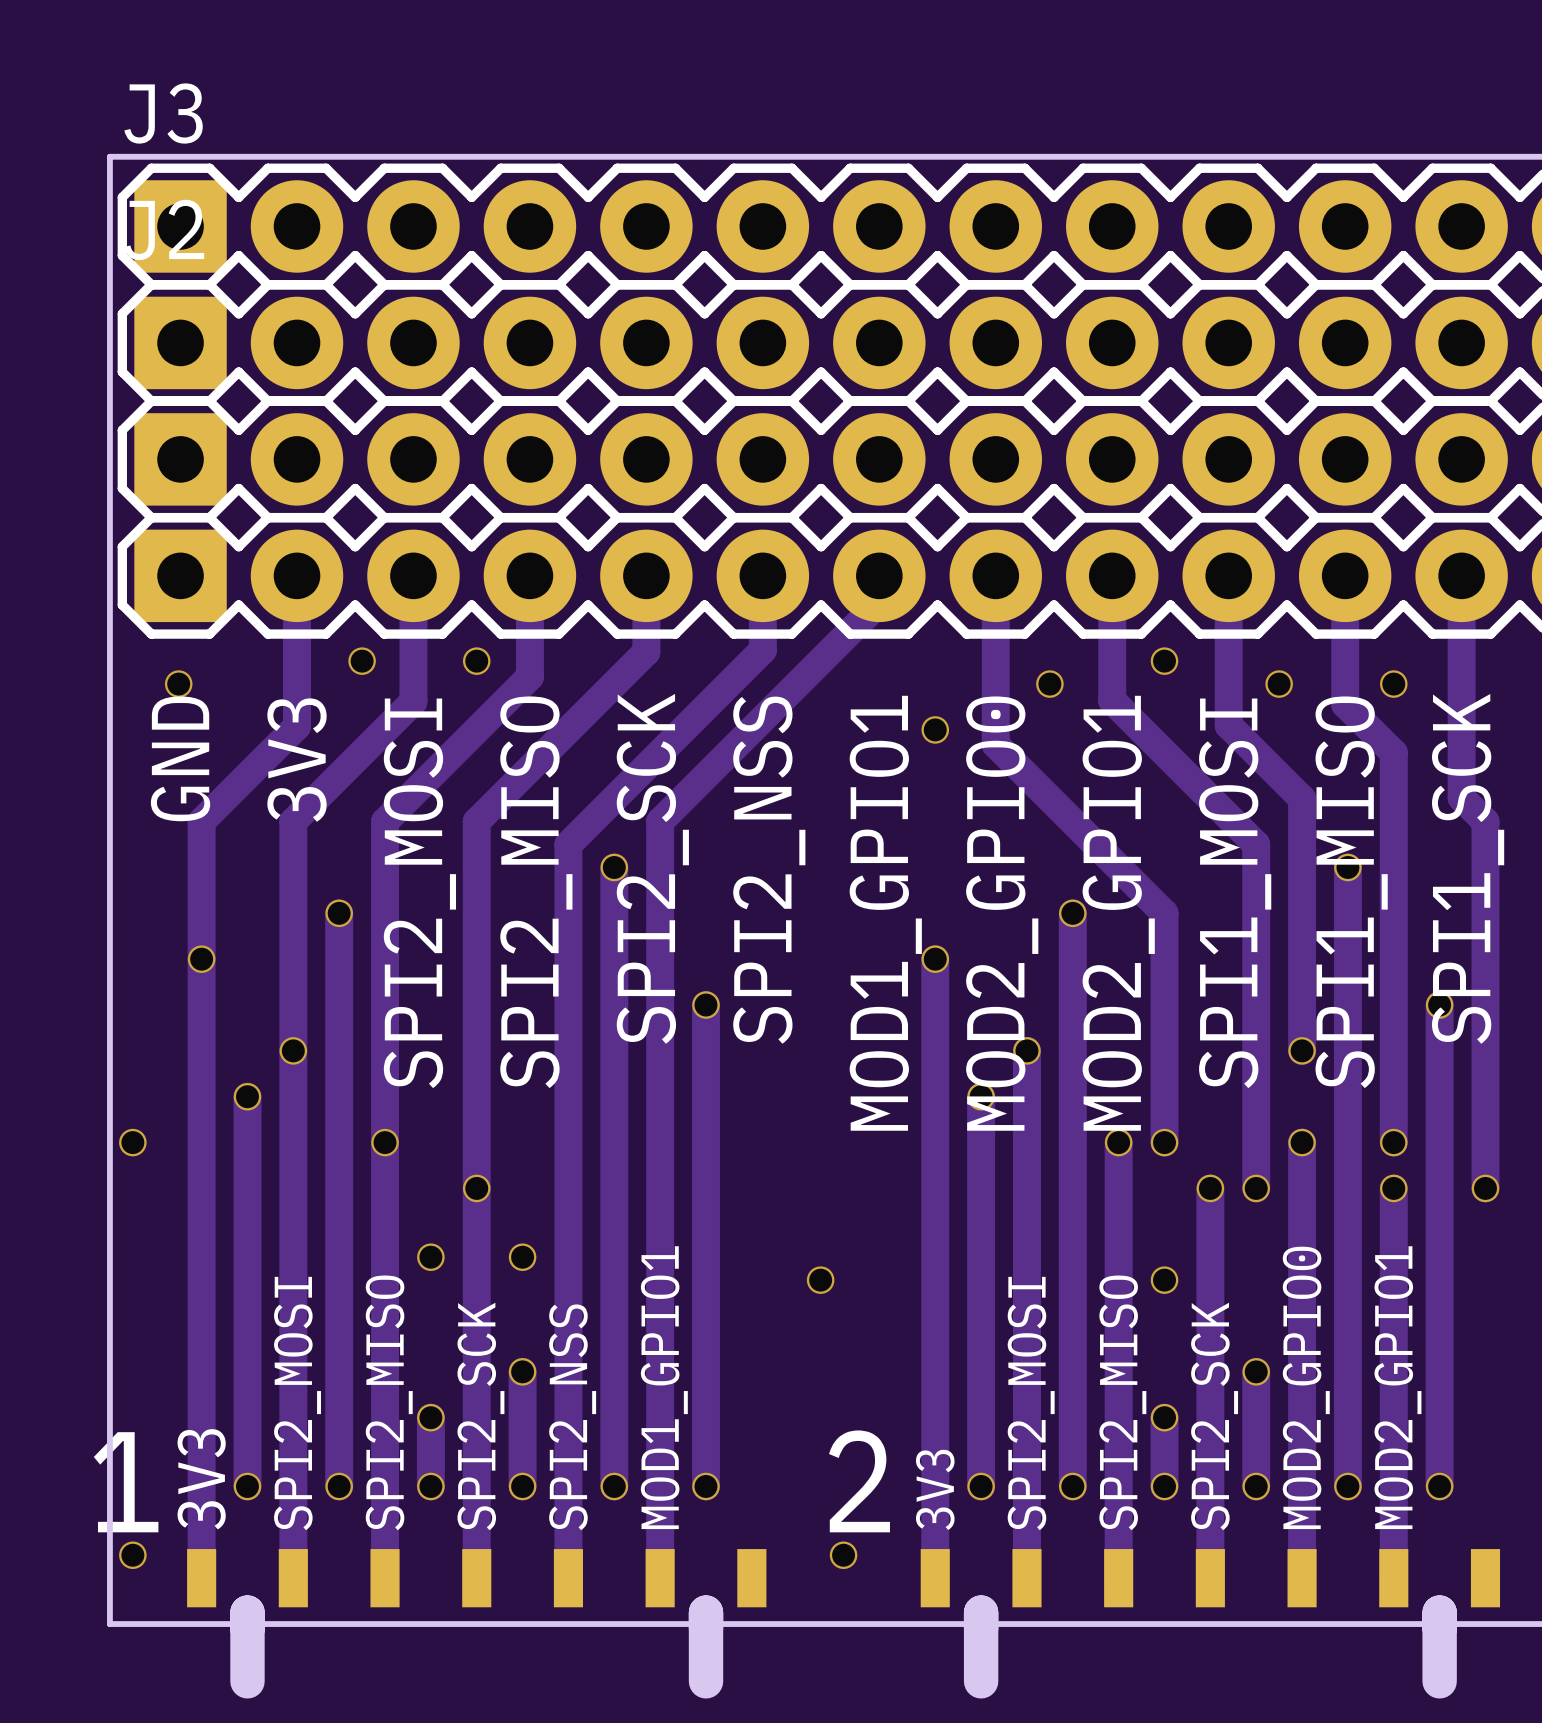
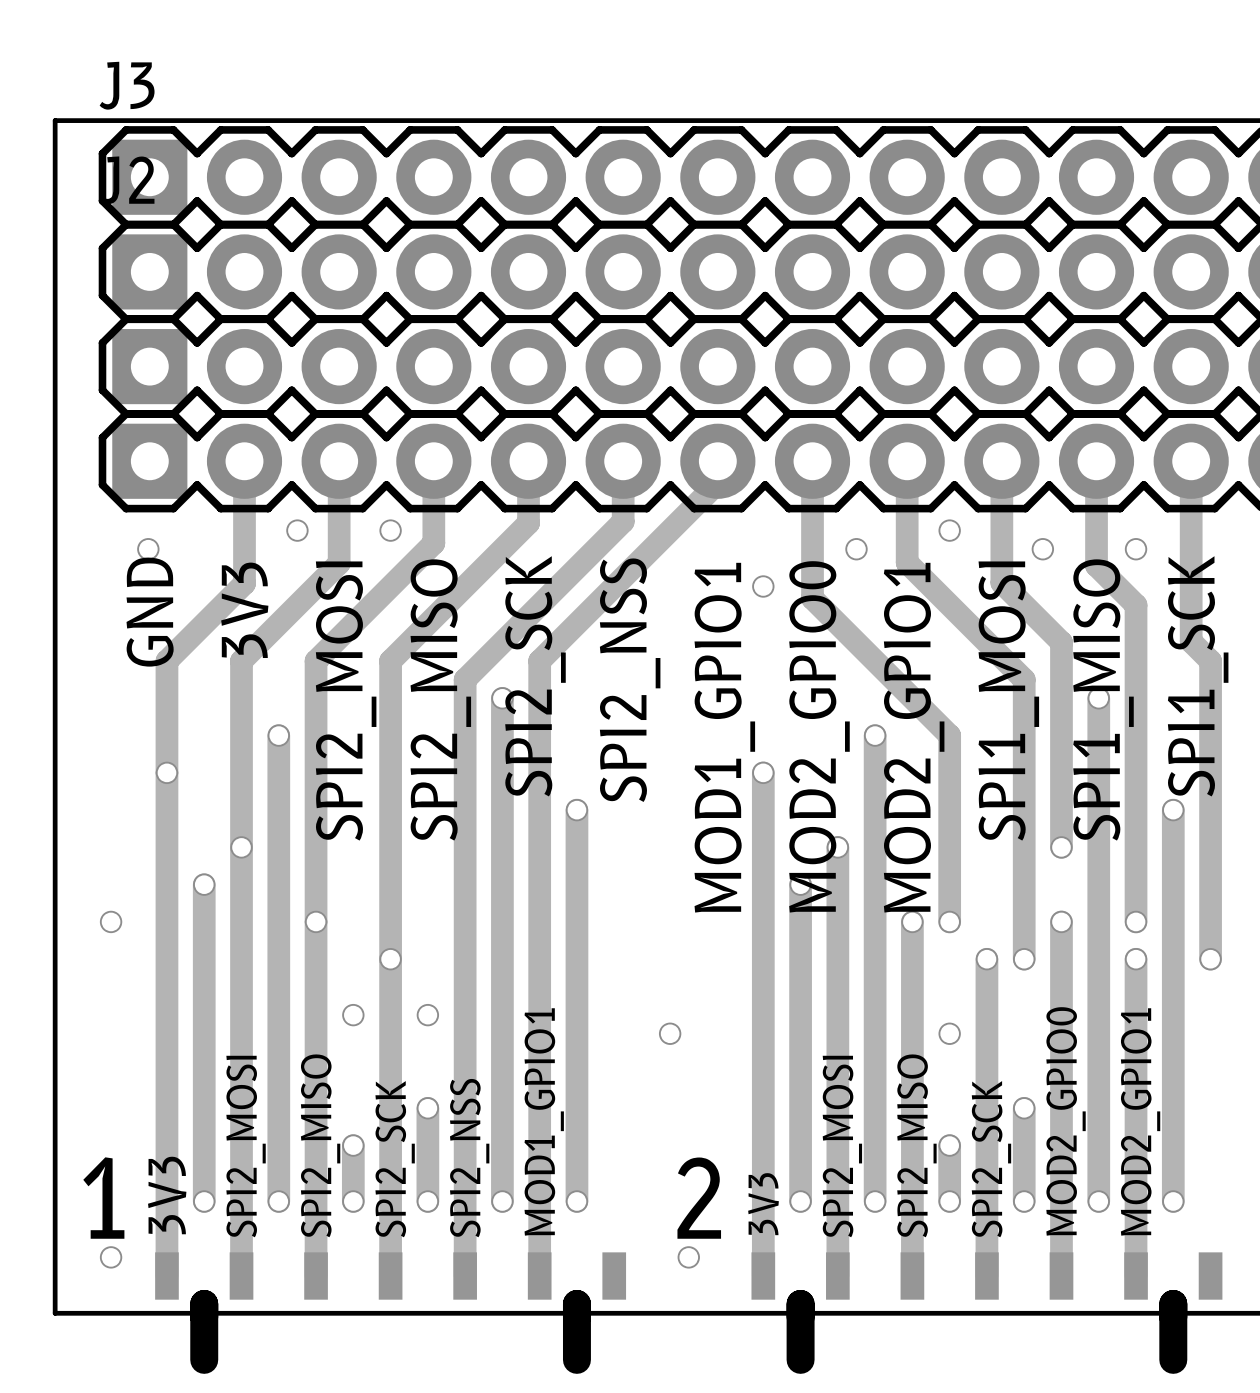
board edge: (109, 156) (109, 1624) -> (92, 120) (55, 120) (55, 1313) (92, 1313)

